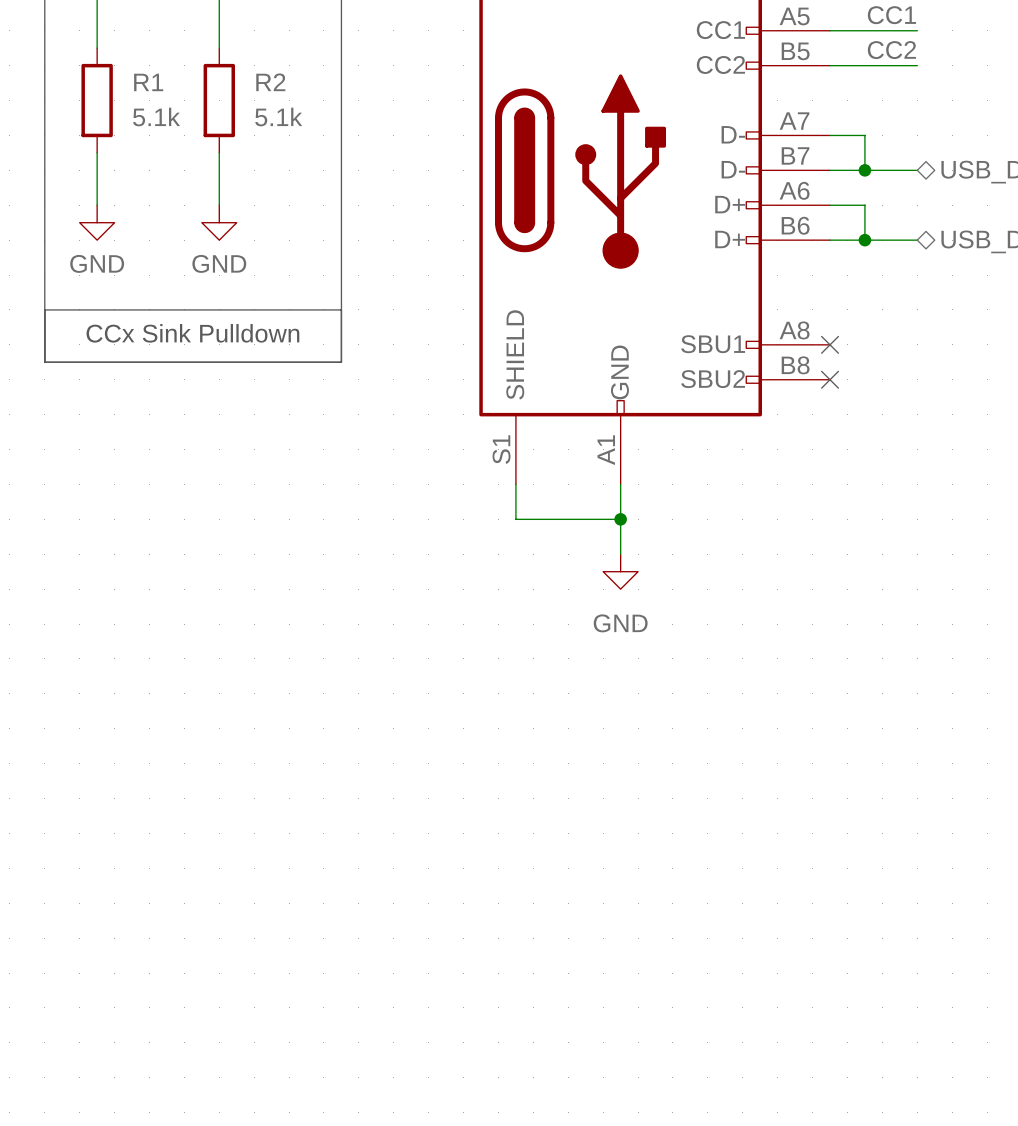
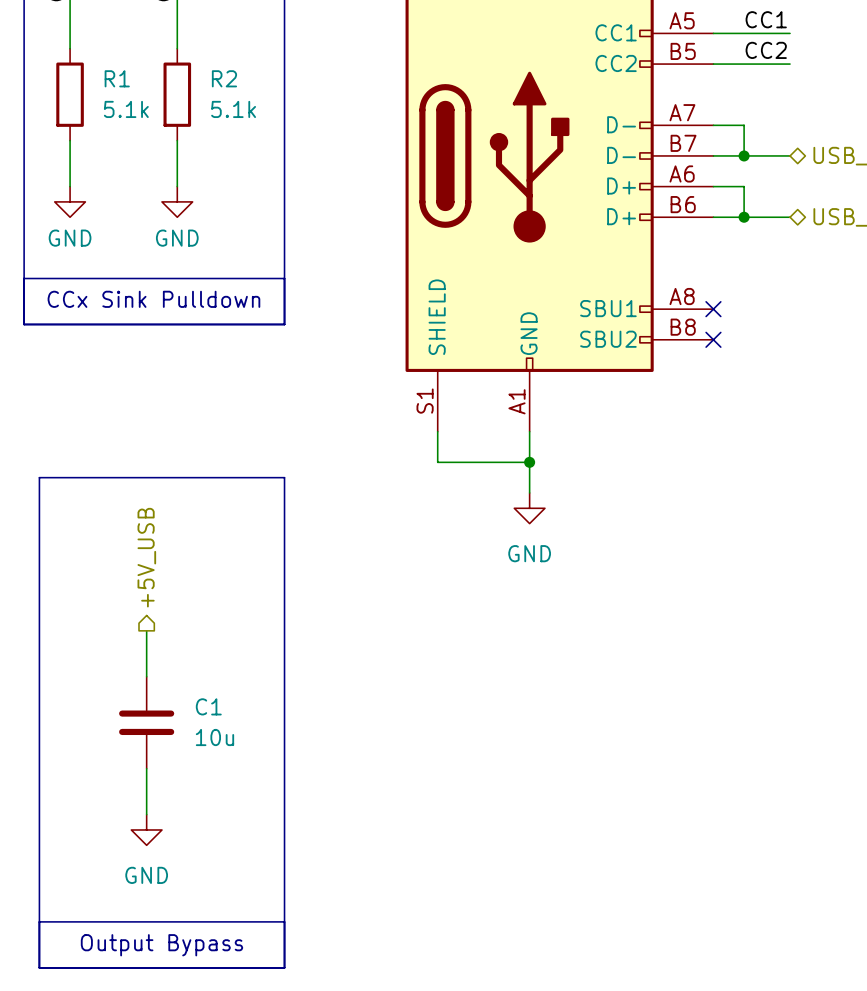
line: none -> (39, 477) (284, 477) (284, 967) (39, 967) (39, 477)
hierarchical label: none -> +5V_USB (146, 557)
wire: none -> (146, 630) (146, 676)
C1: none -> 10u (146, 722)
wire: none -> (146, 768) (146, 814)
power symbol: none -> GND (146, 829)
line: none -> (39, 921) (284, 921)
text: none -> Output Bypass (161, 945)

